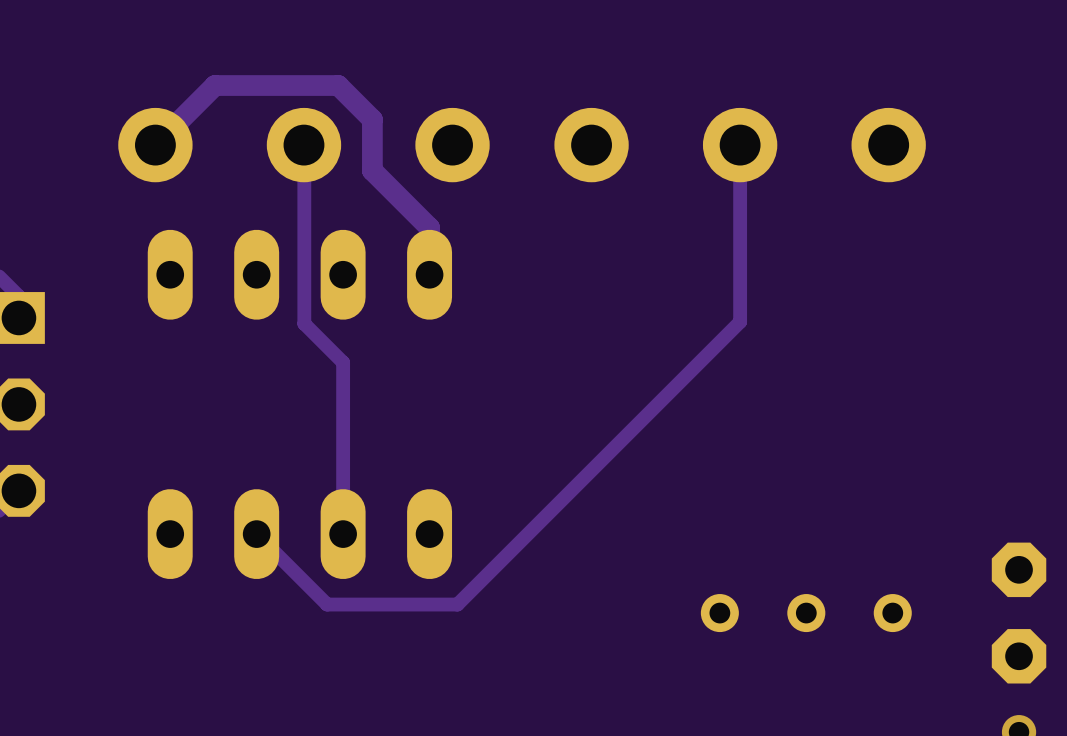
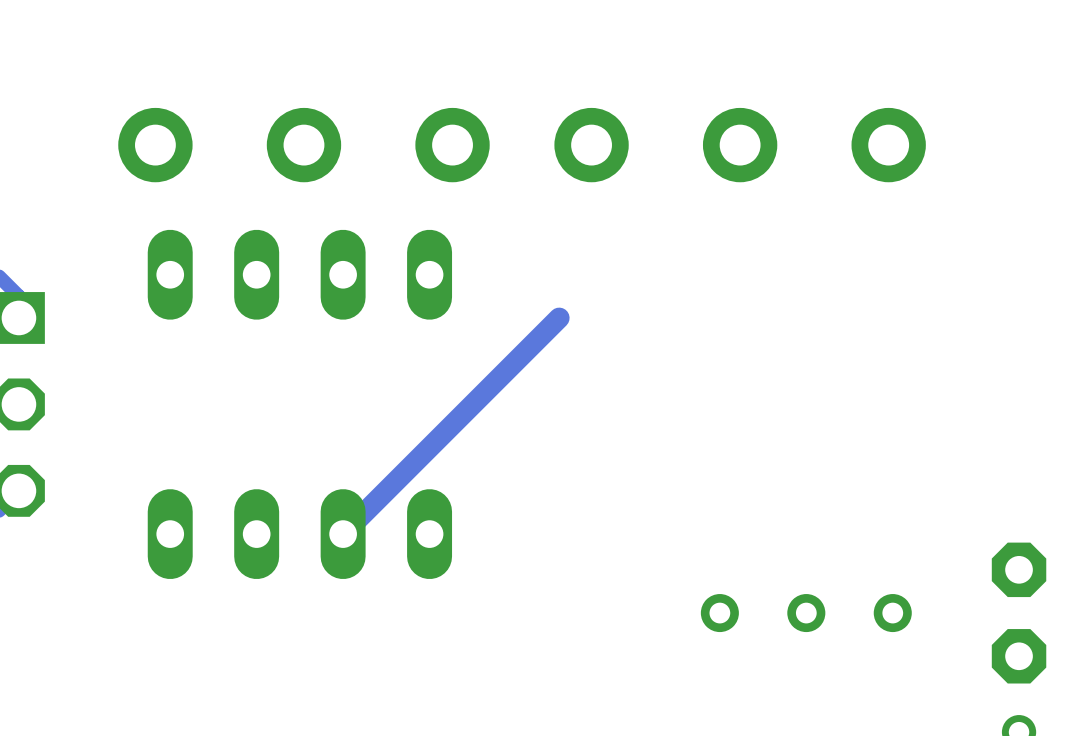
track: (155, 145) (214, 85) (338, 85) (372, 119) (372, 170) (429, 227) (429, 274) -> none
track: (304, 145) (304, 323) (343, 362) (343, 534) -> (559, 317) (343, 534)
track: (740, 145) (740, 321) (457, 604) (327, 604) (256, 534) -> none

